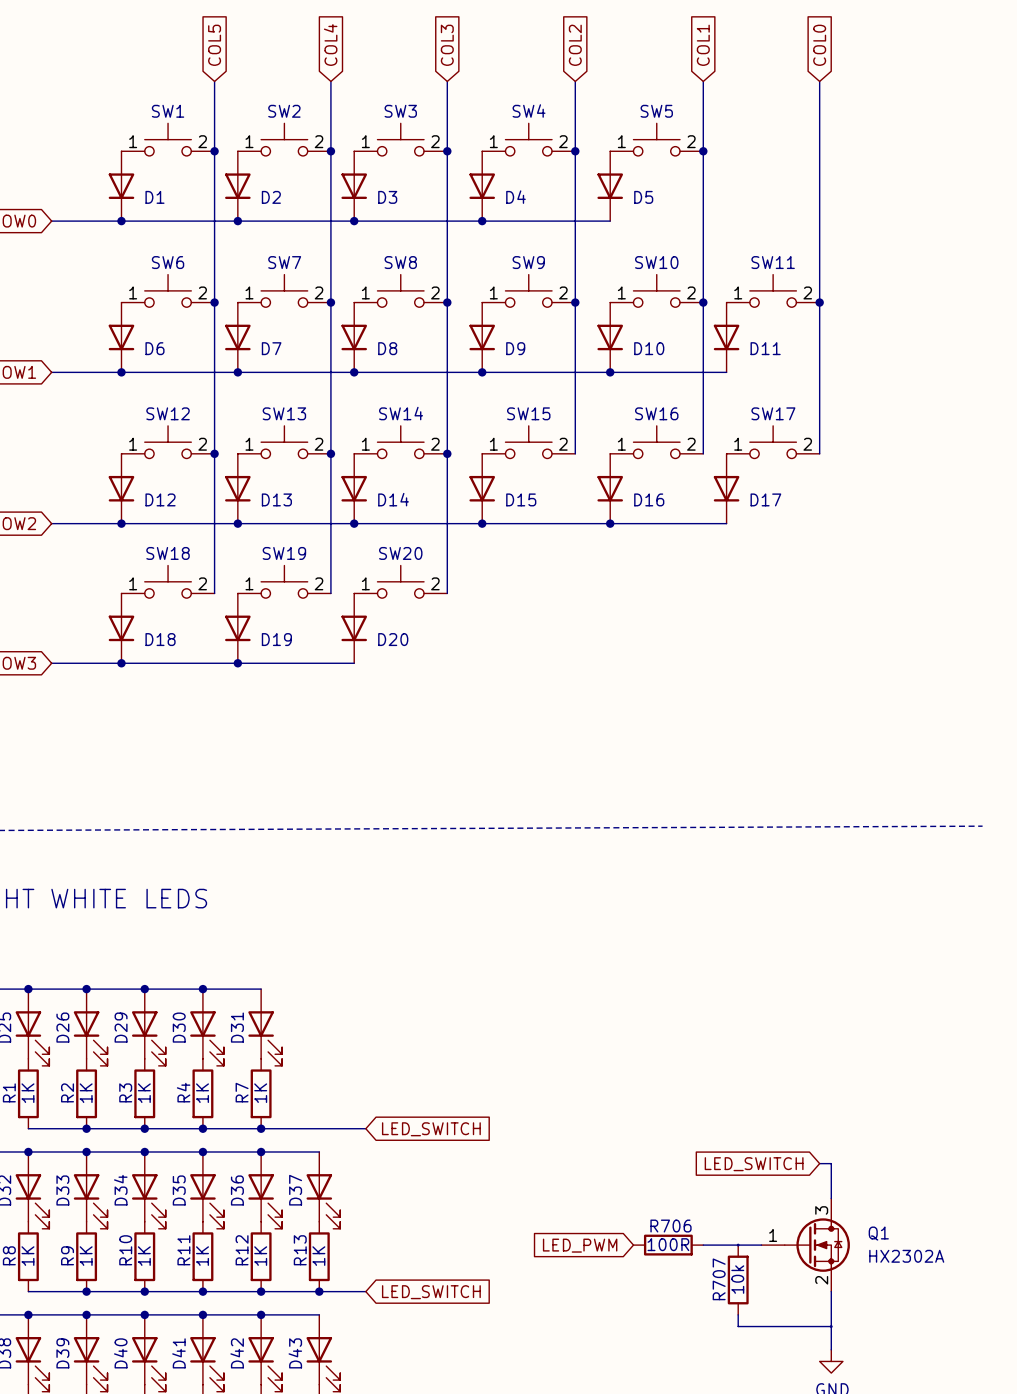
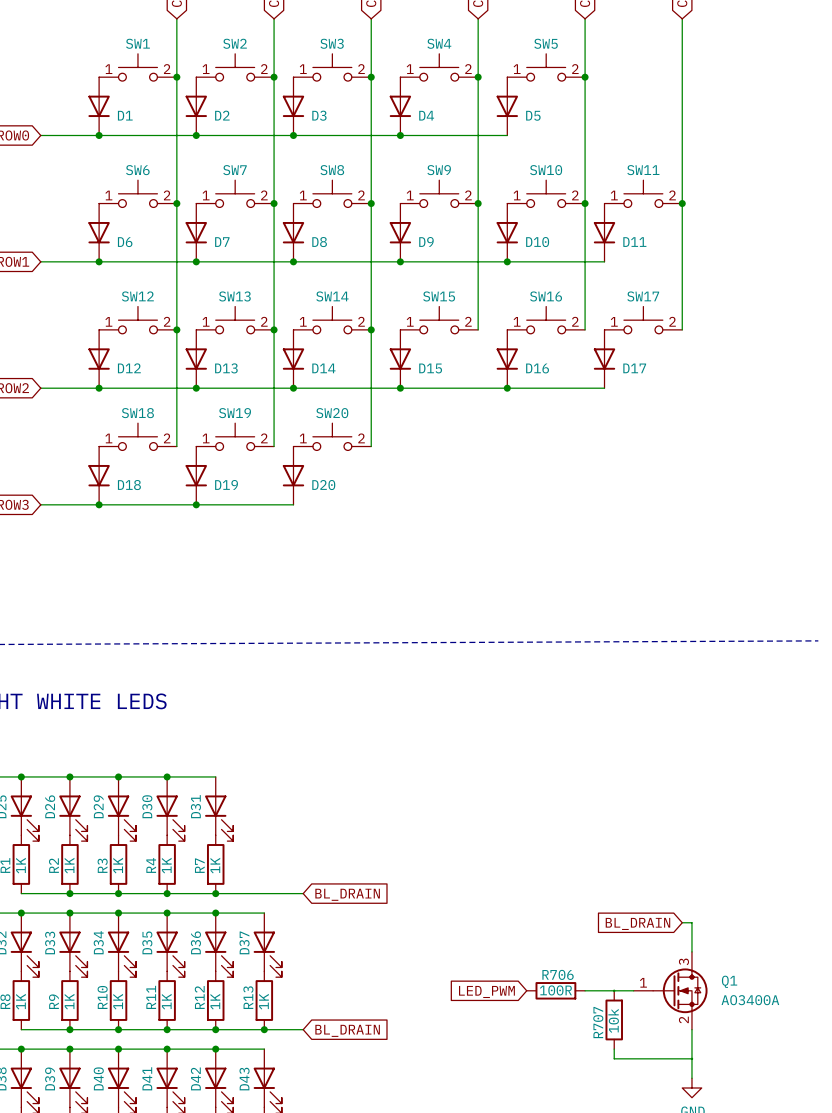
global label: LED_SWITCH (431, 1129) -> BL_DRAIN (347, 894)
global label: LED_SWITCH (754, 1164) -> BL_DRAIN (637, 923)
Q1 value: HX2302A (906, 1256) -> AO3400A (750, 1000)
global label: LED_SWITCH (431, 1292) -> BL_DRAIN (347, 1030)

